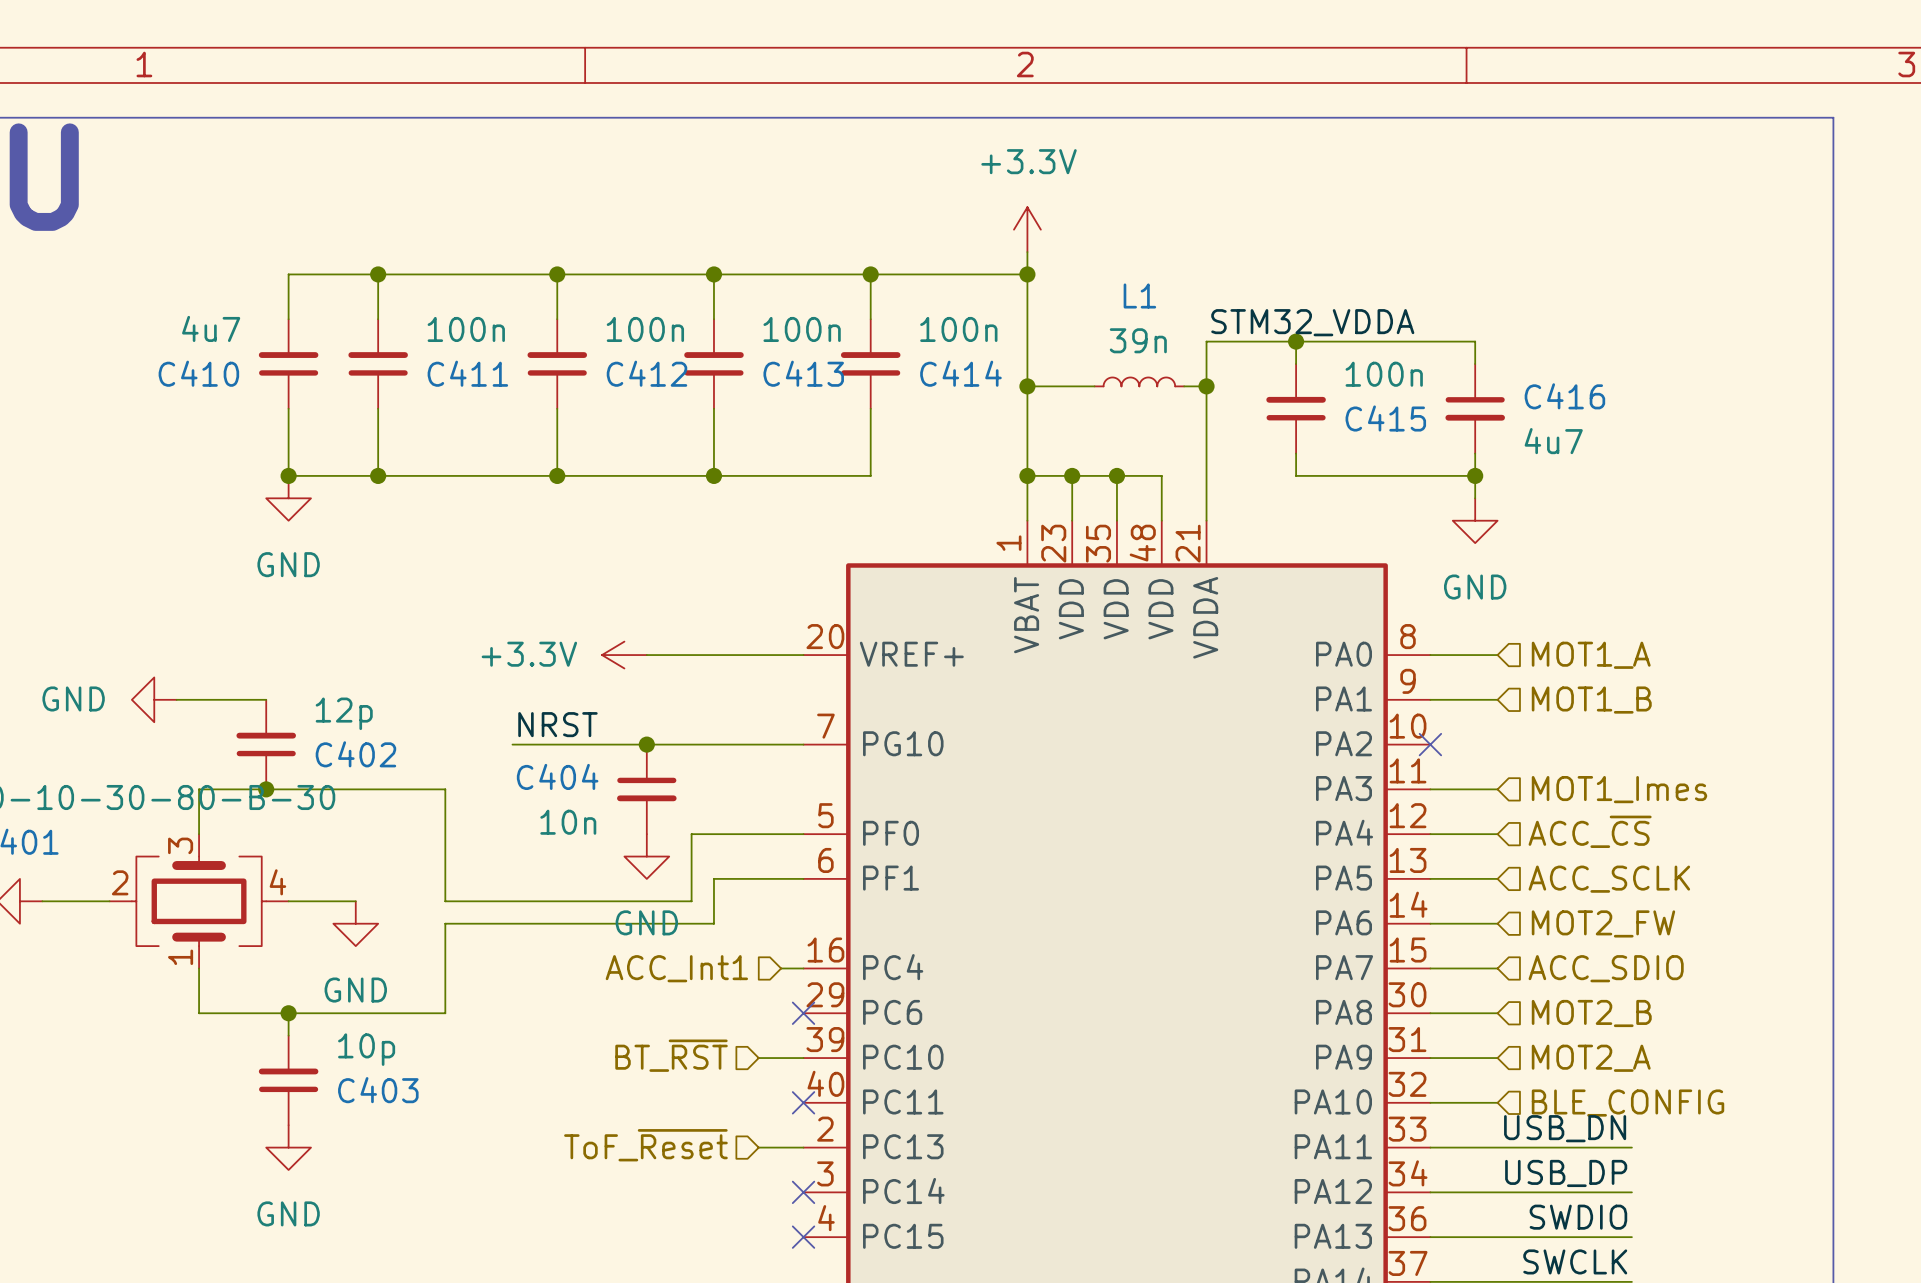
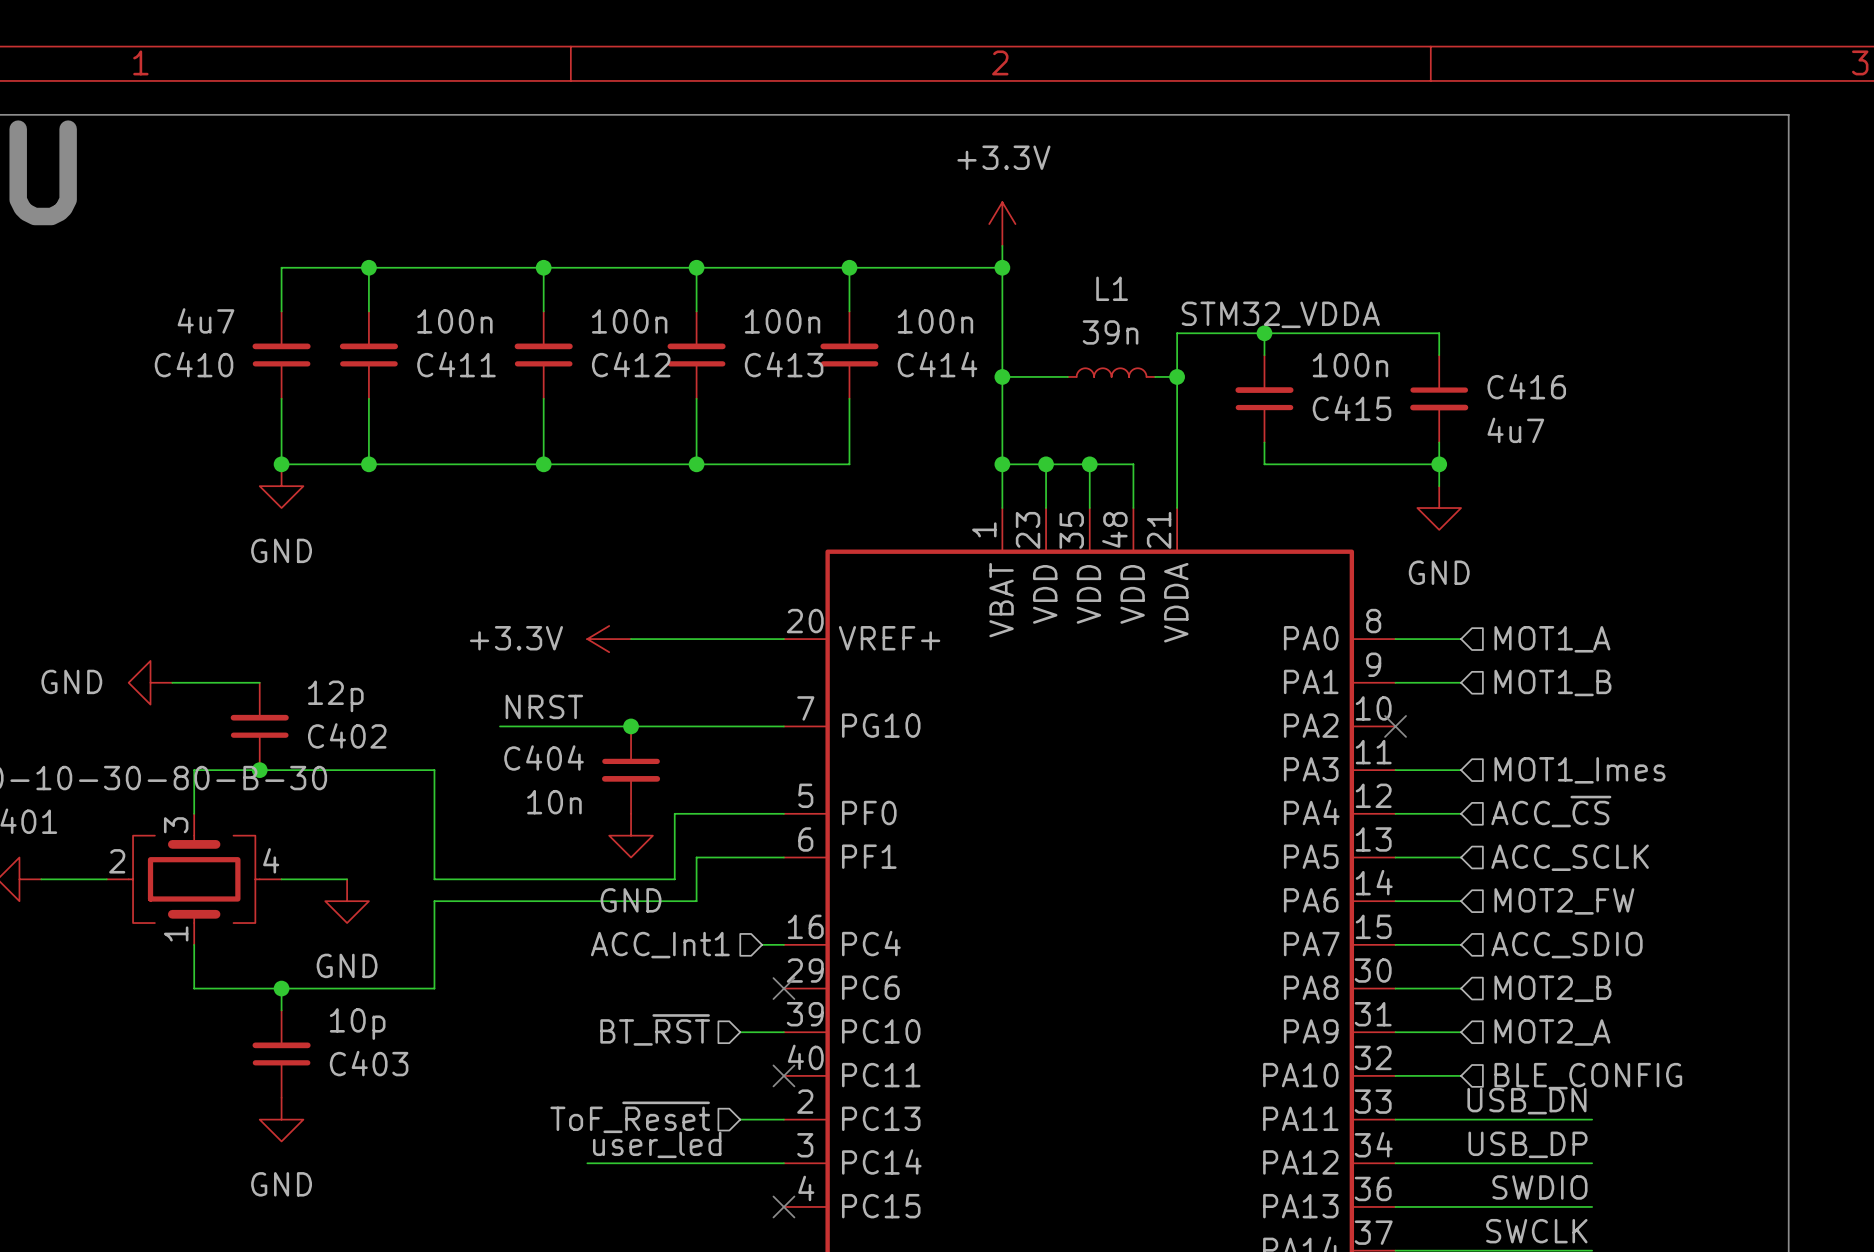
label: none -> user_led (657, 1144)
wire: none -> (587, 1163) (783, 1163)
no-connect mark: (803, 1192) -> none

